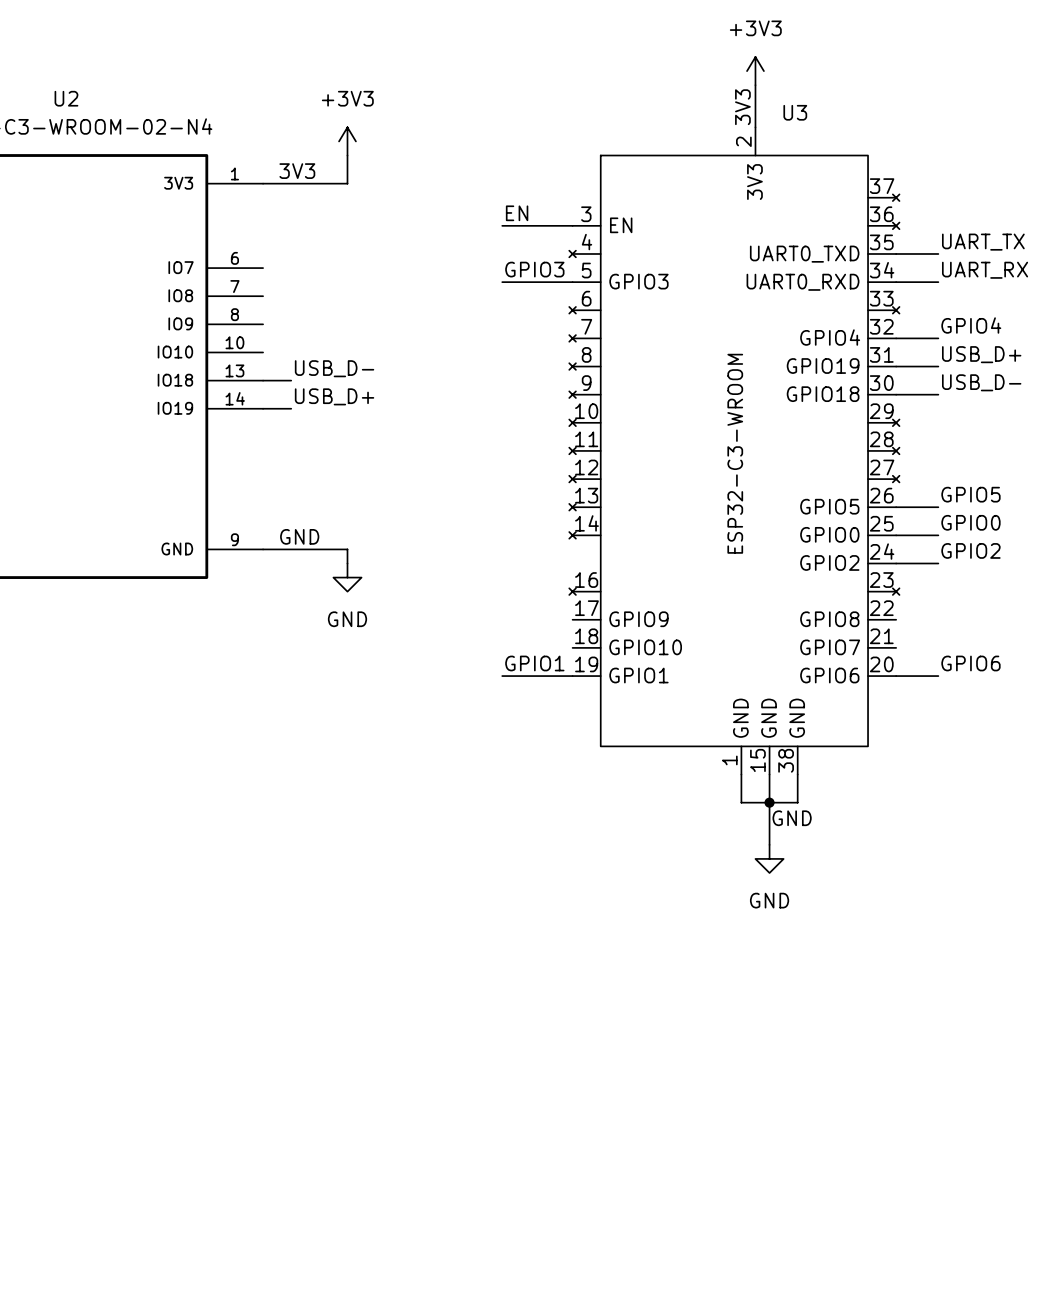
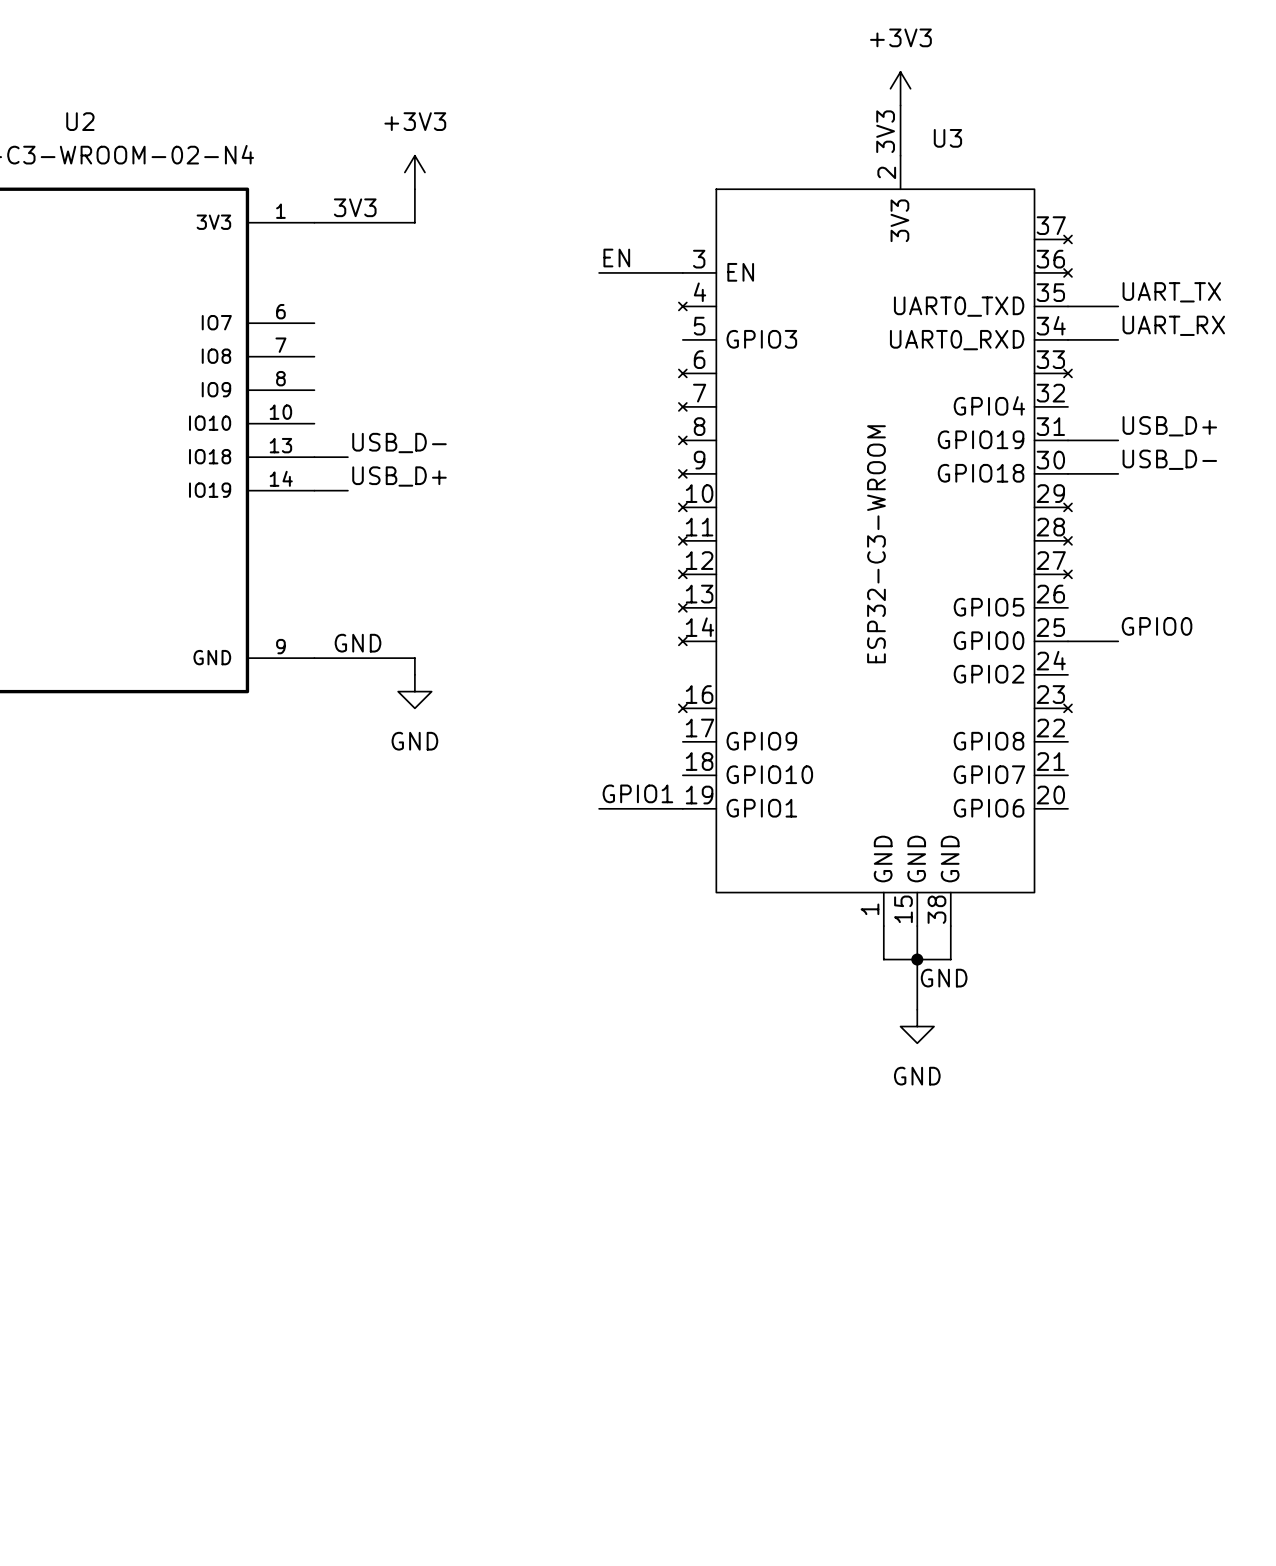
label: GPIO3 (534, 269) -> none
wire: (502, 282) (572, 282) -> none
label: GPIO4 (971, 325) -> none
wire: (896, 338) (938, 338) -> none
label: GPIO5 (970, 494) -> none
wire: (896, 507) (938, 507) -> none
label: GPIO2 (970, 550) -> none
wire: (896, 563) (938, 563) -> none
label: GPIO6 (970, 663) -> none
wire: (896, 676) (938, 676) -> none

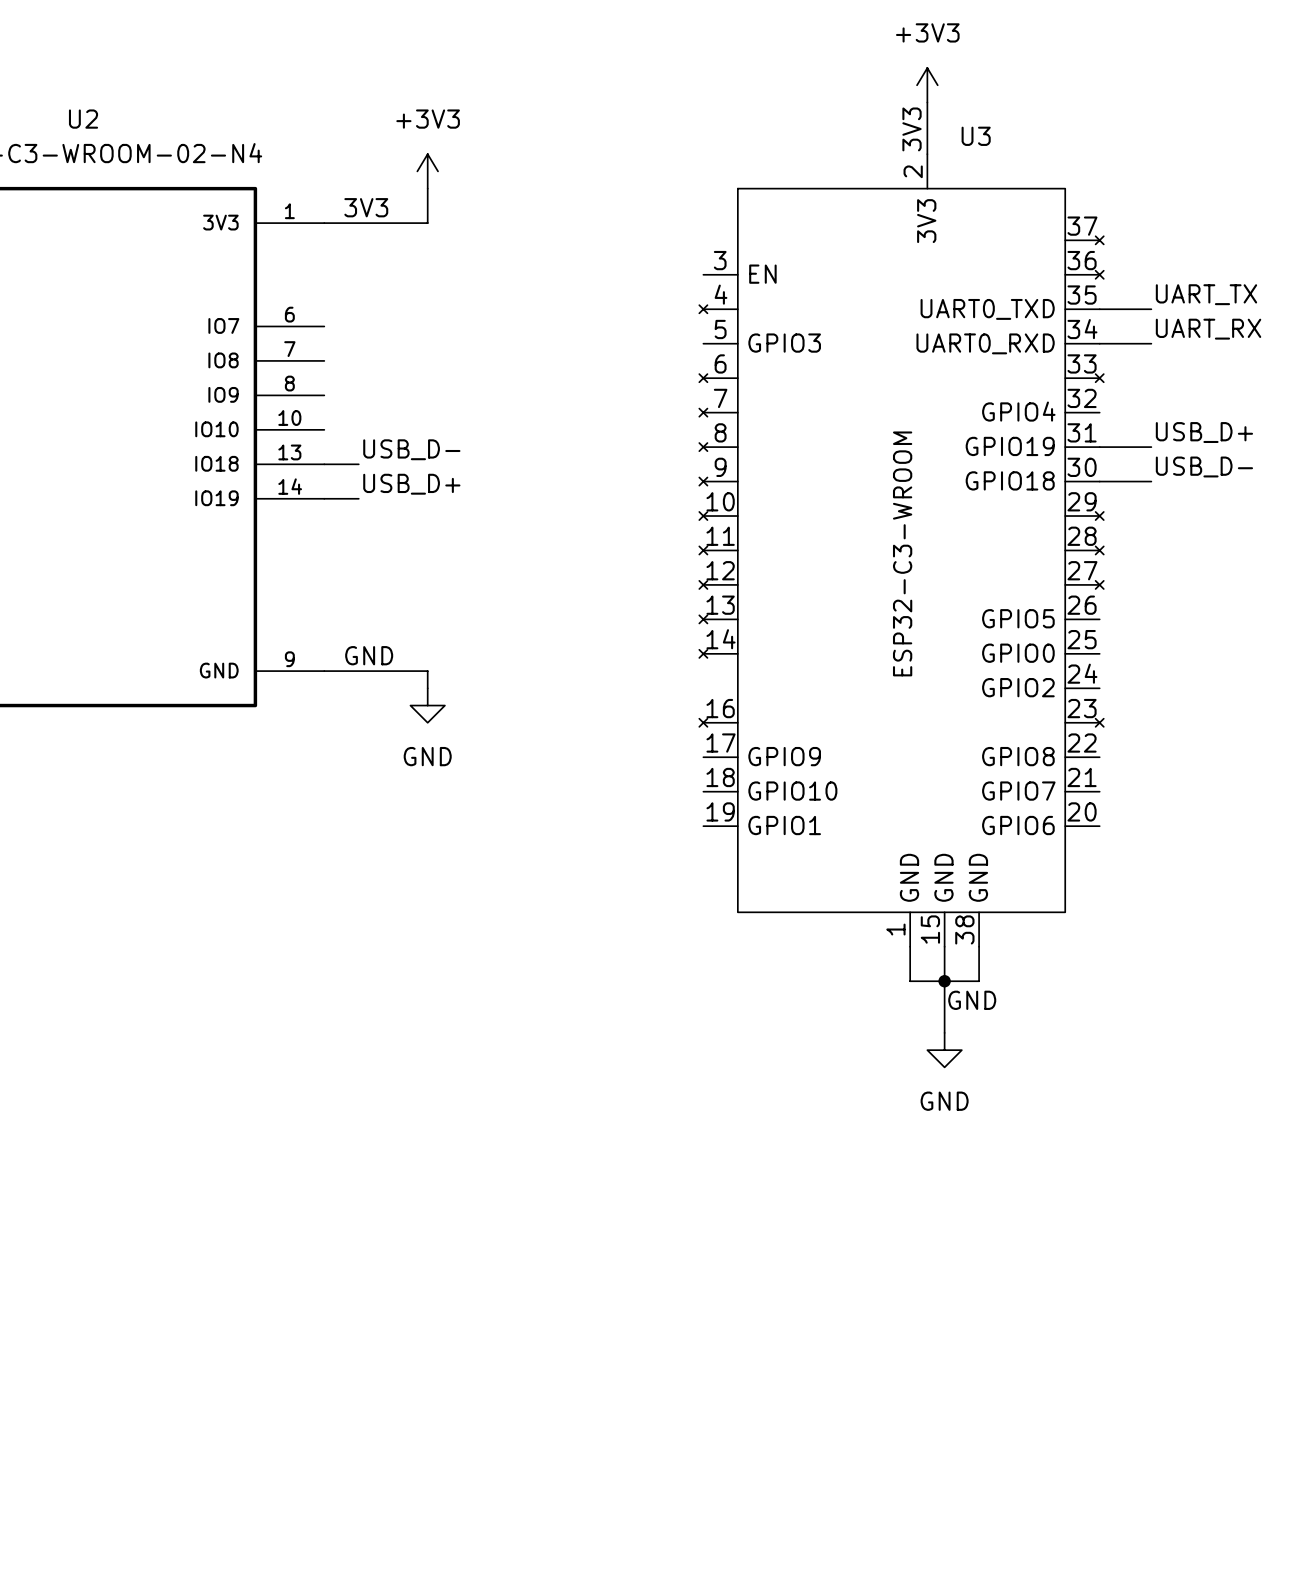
label: EN (616, 258) -> none
wire: (599, 272) (682, 272) -> none
label: GPIO0 (1157, 626) -> none
wire: (1068, 641) (1118, 641) -> none
label: GPIO1 (637, 793) -> none
wire: (599, 808) (682, 808) -> none

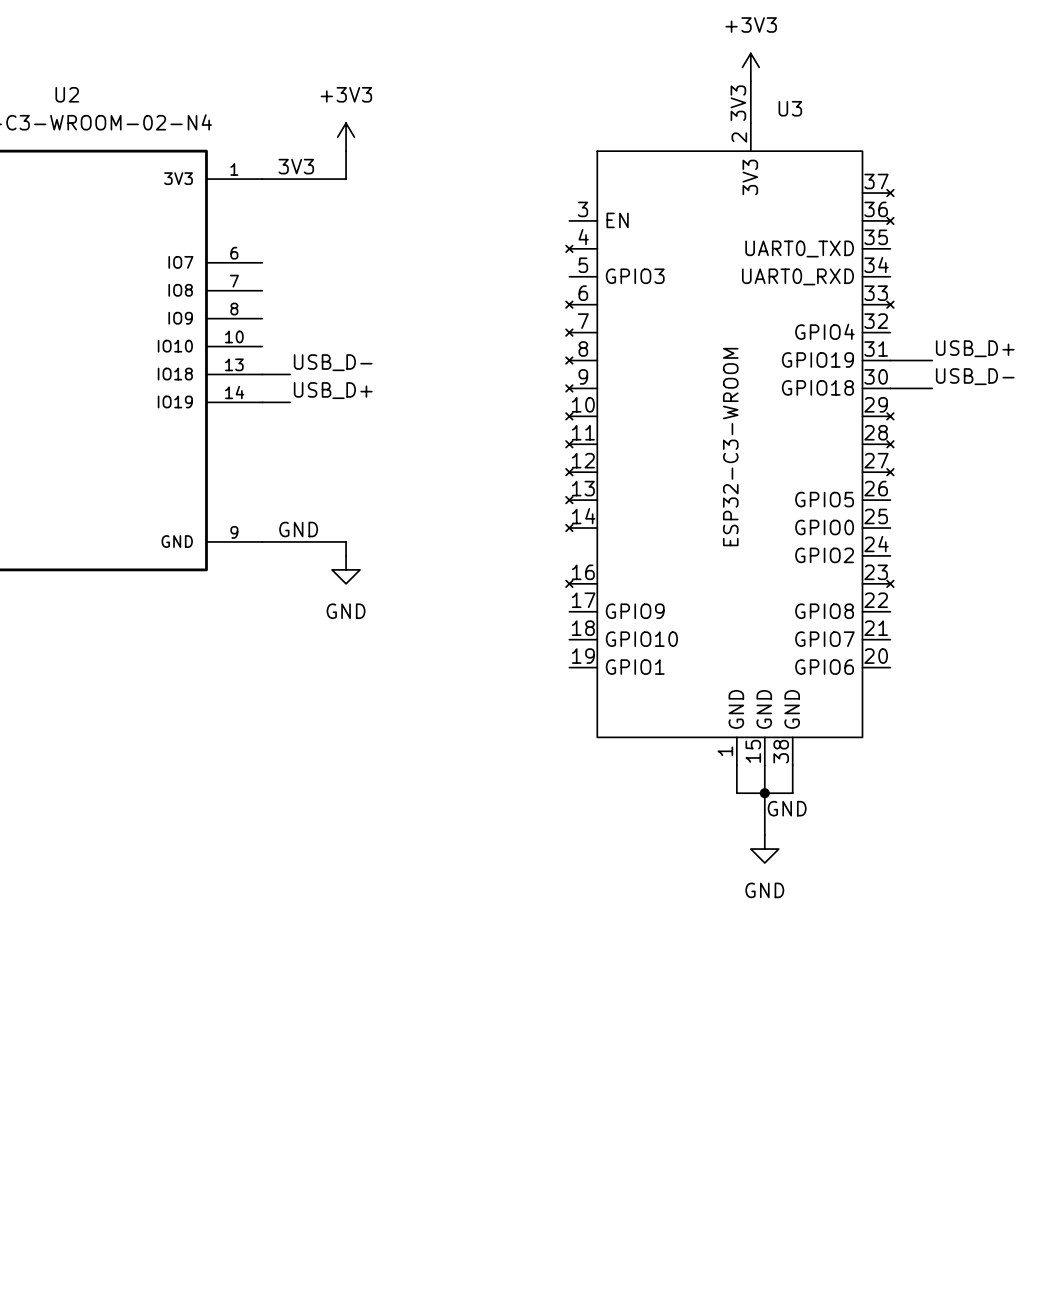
label: UART_TX (1206, 294) -> none
wire: (1099, 309) (1151, 309) -> none
label: UART_RX (1208, 329) -> none
wire: (1099, 343) (1151, 343) -> none

